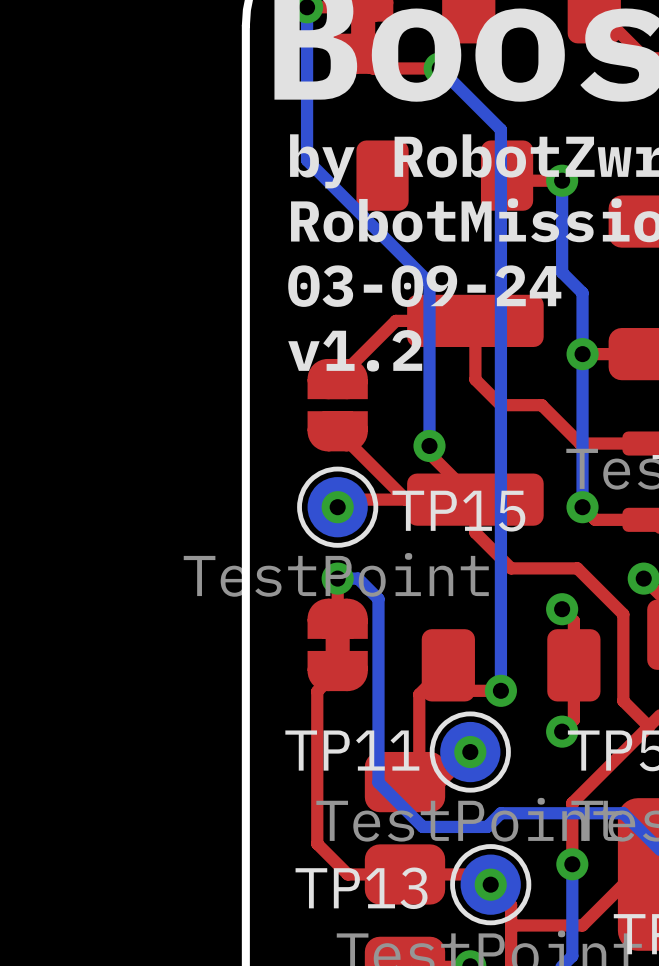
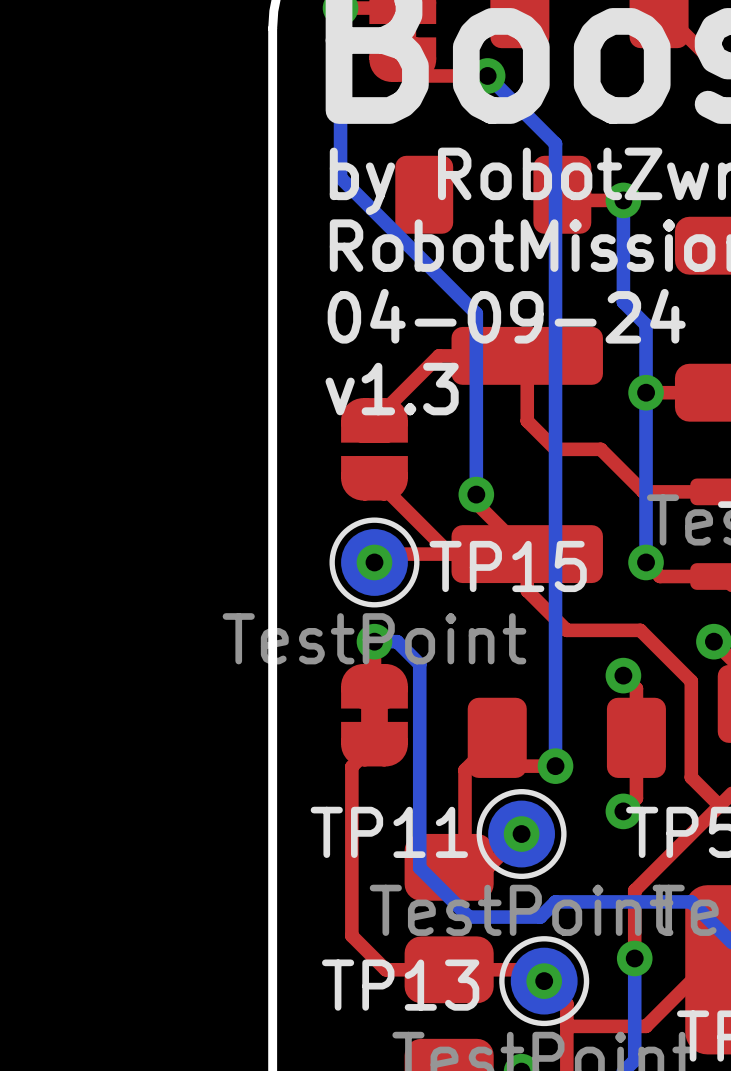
text: 03-09-24 (424, 286) -> 04-09-24 (506, 316)
text: v1.2 (355, 350) -> v1.3 (392, 389)

